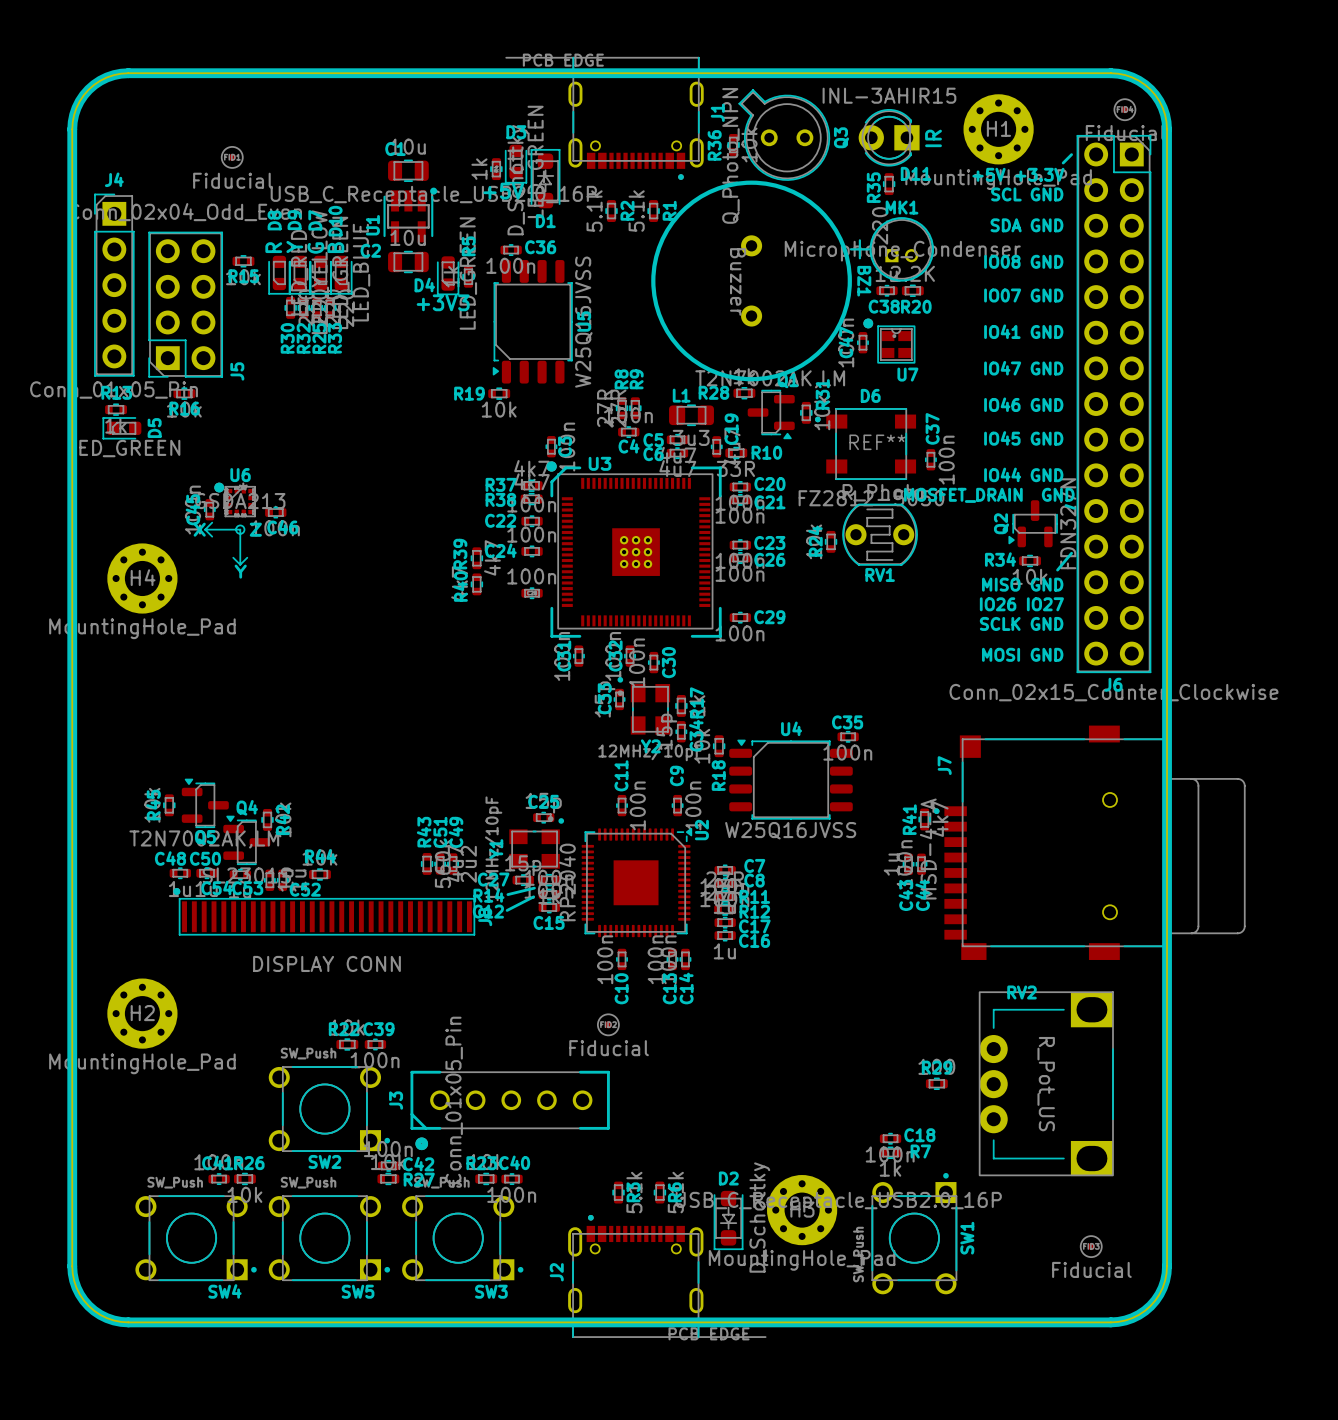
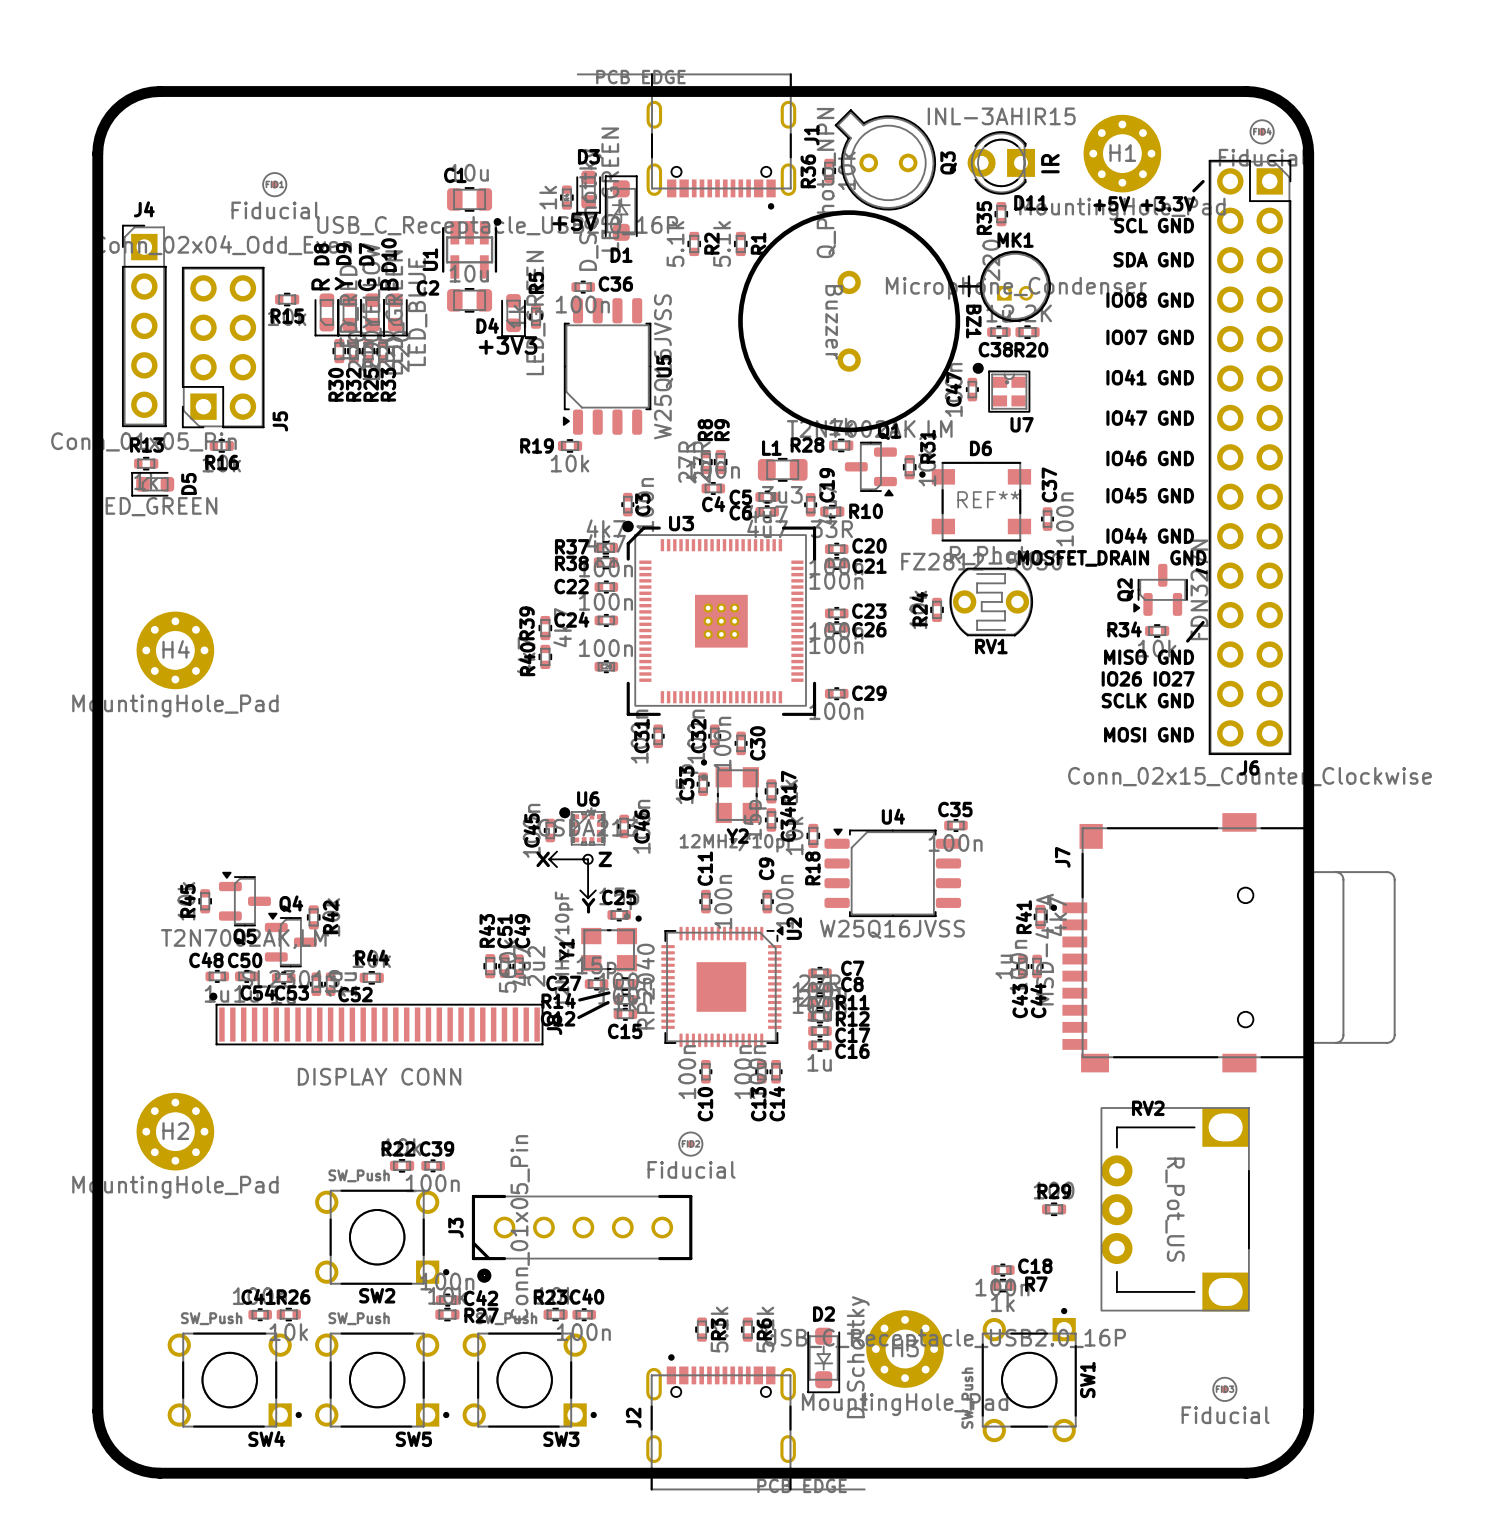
C45 position: (209, 509) -> (550, 830)
C46 rotation: 0° (275, 512) -> 90° clockwise (624, 826)
C46 position: (275, 512) -> (624, 826)
U6 position: (229, 524) -> (576, 853)

